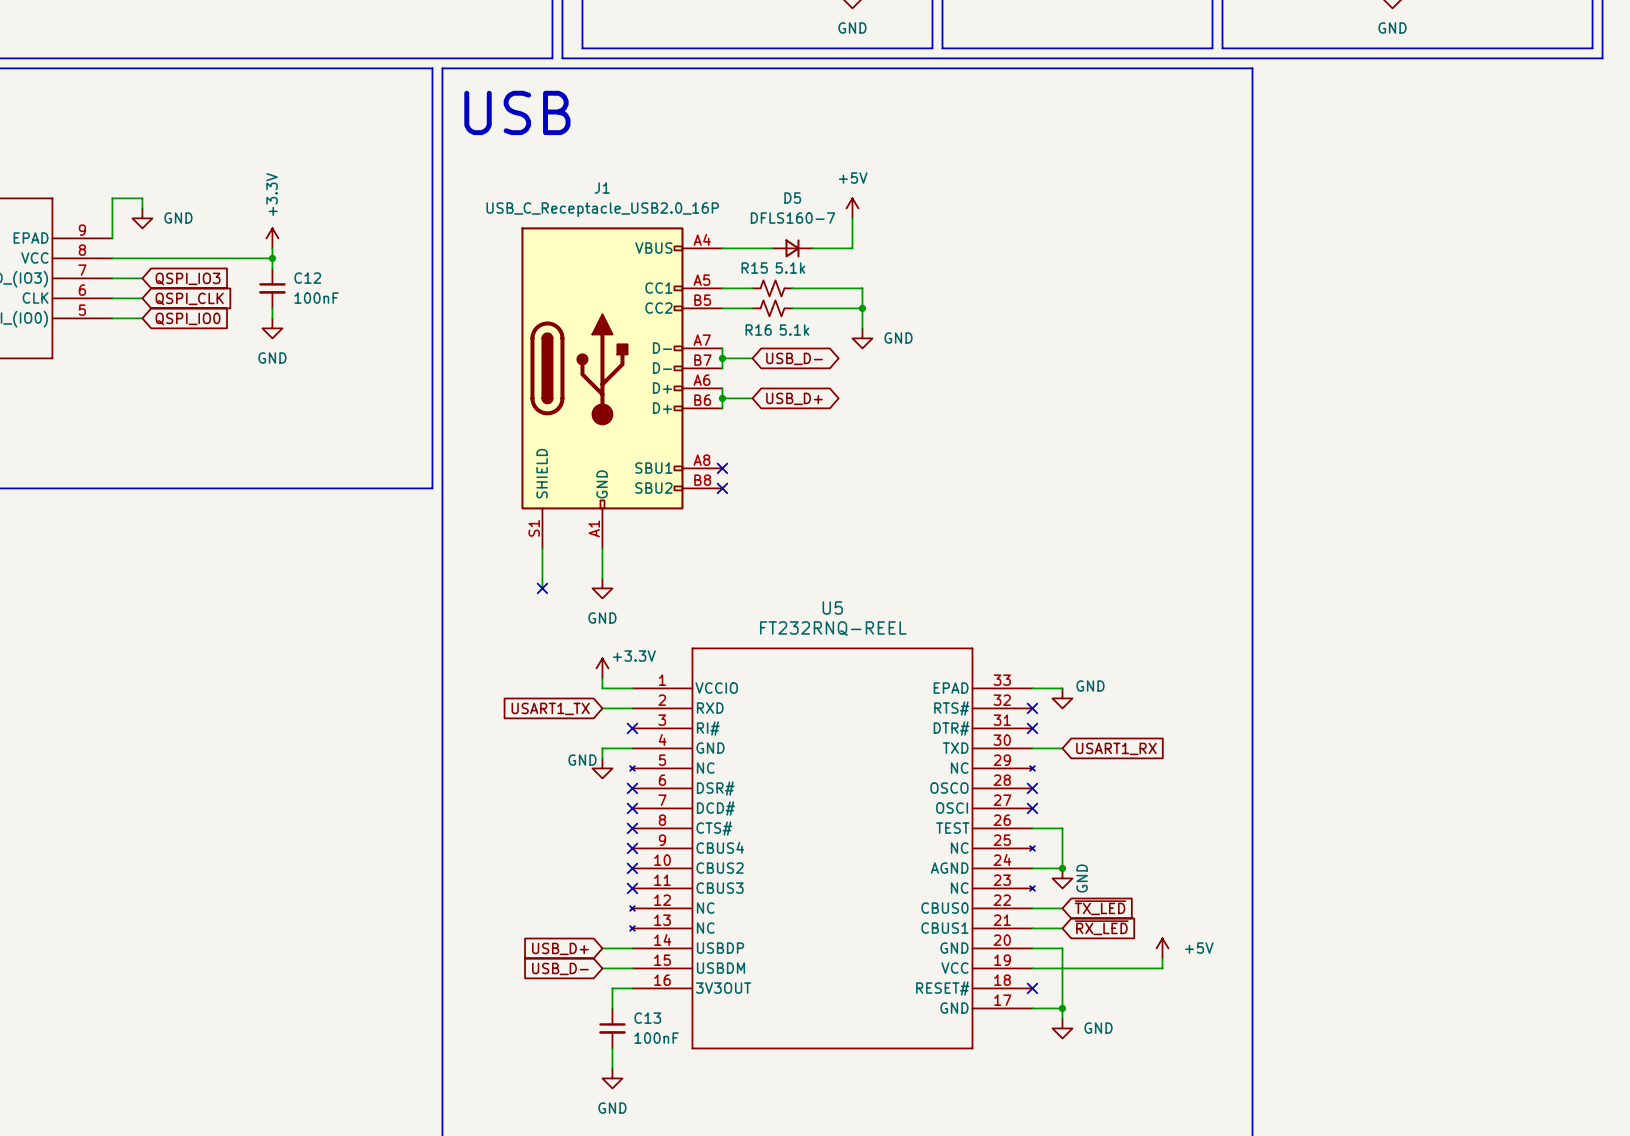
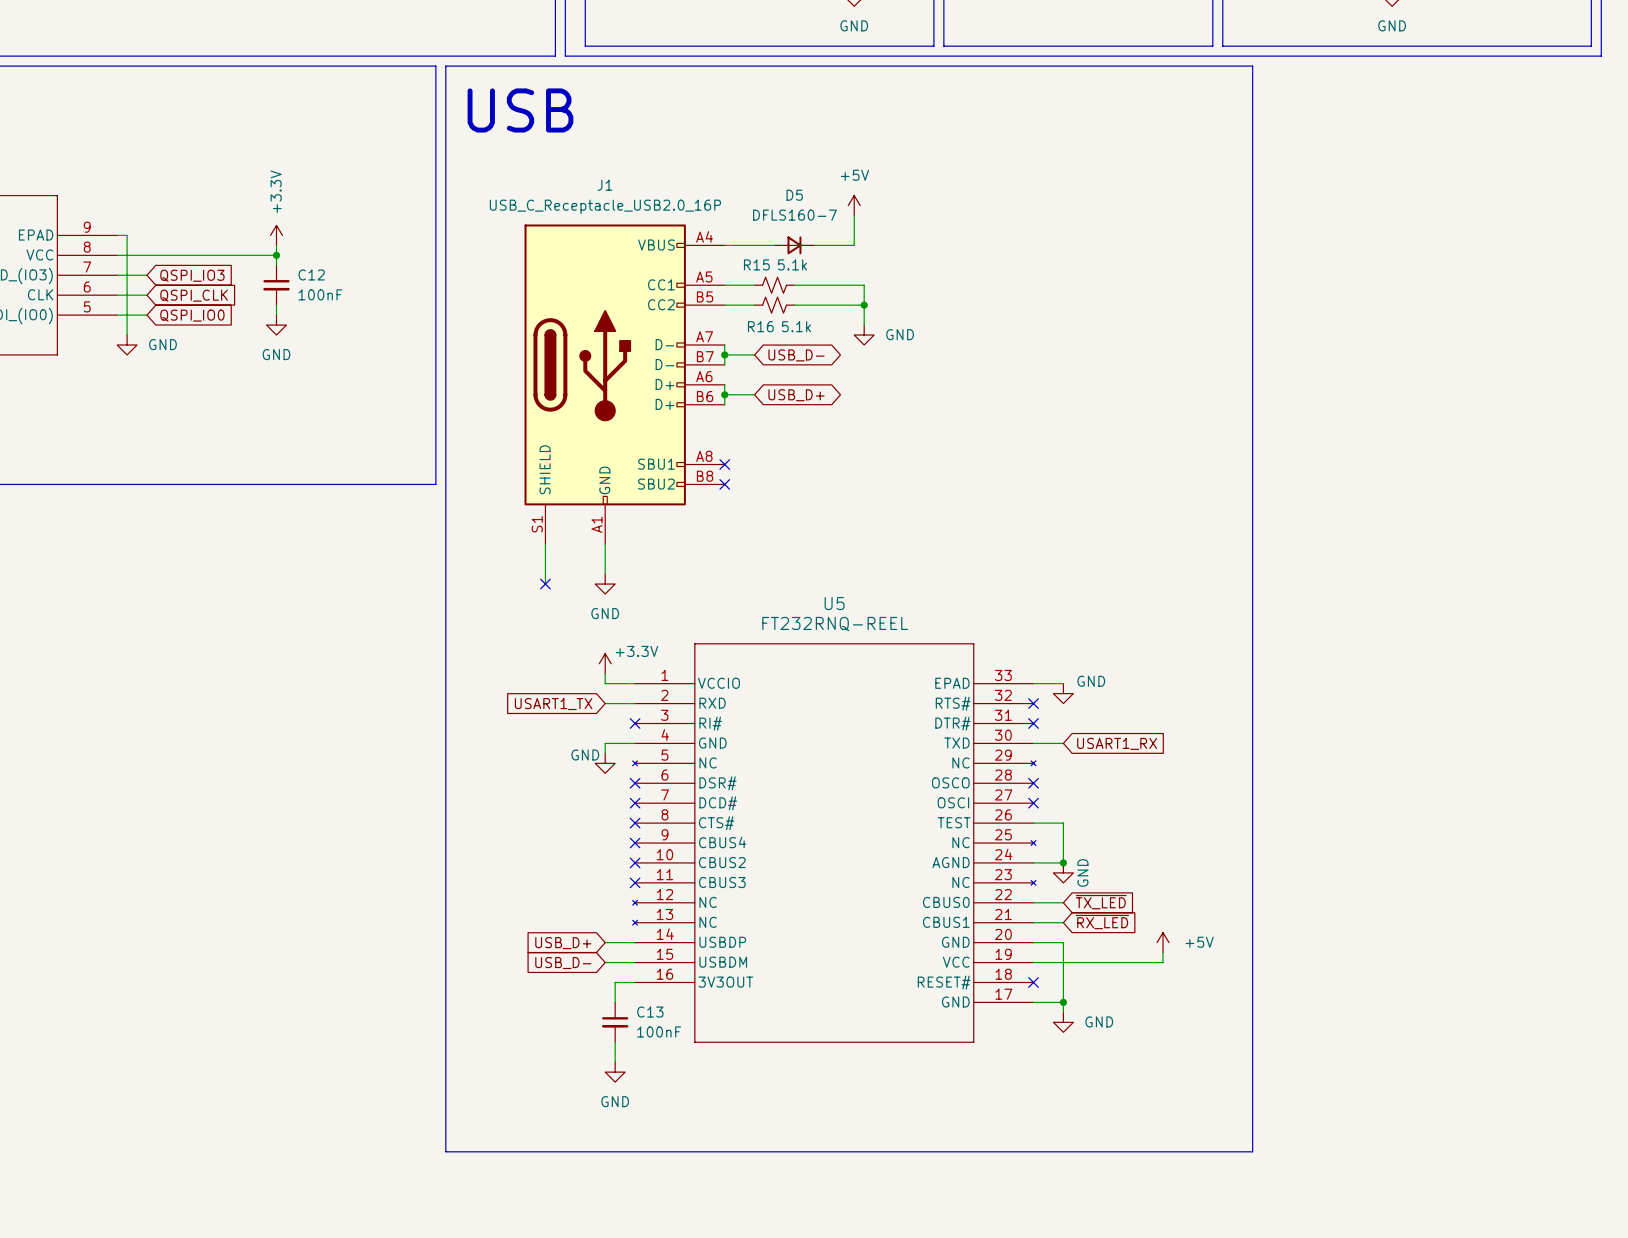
wire: (142, 208) (142, 198) (112, 198) (112, 238) -> (127, 335) (127, 235) (117, 235)
power symbol position: GND (142, 218) -> GND (127, 344)

